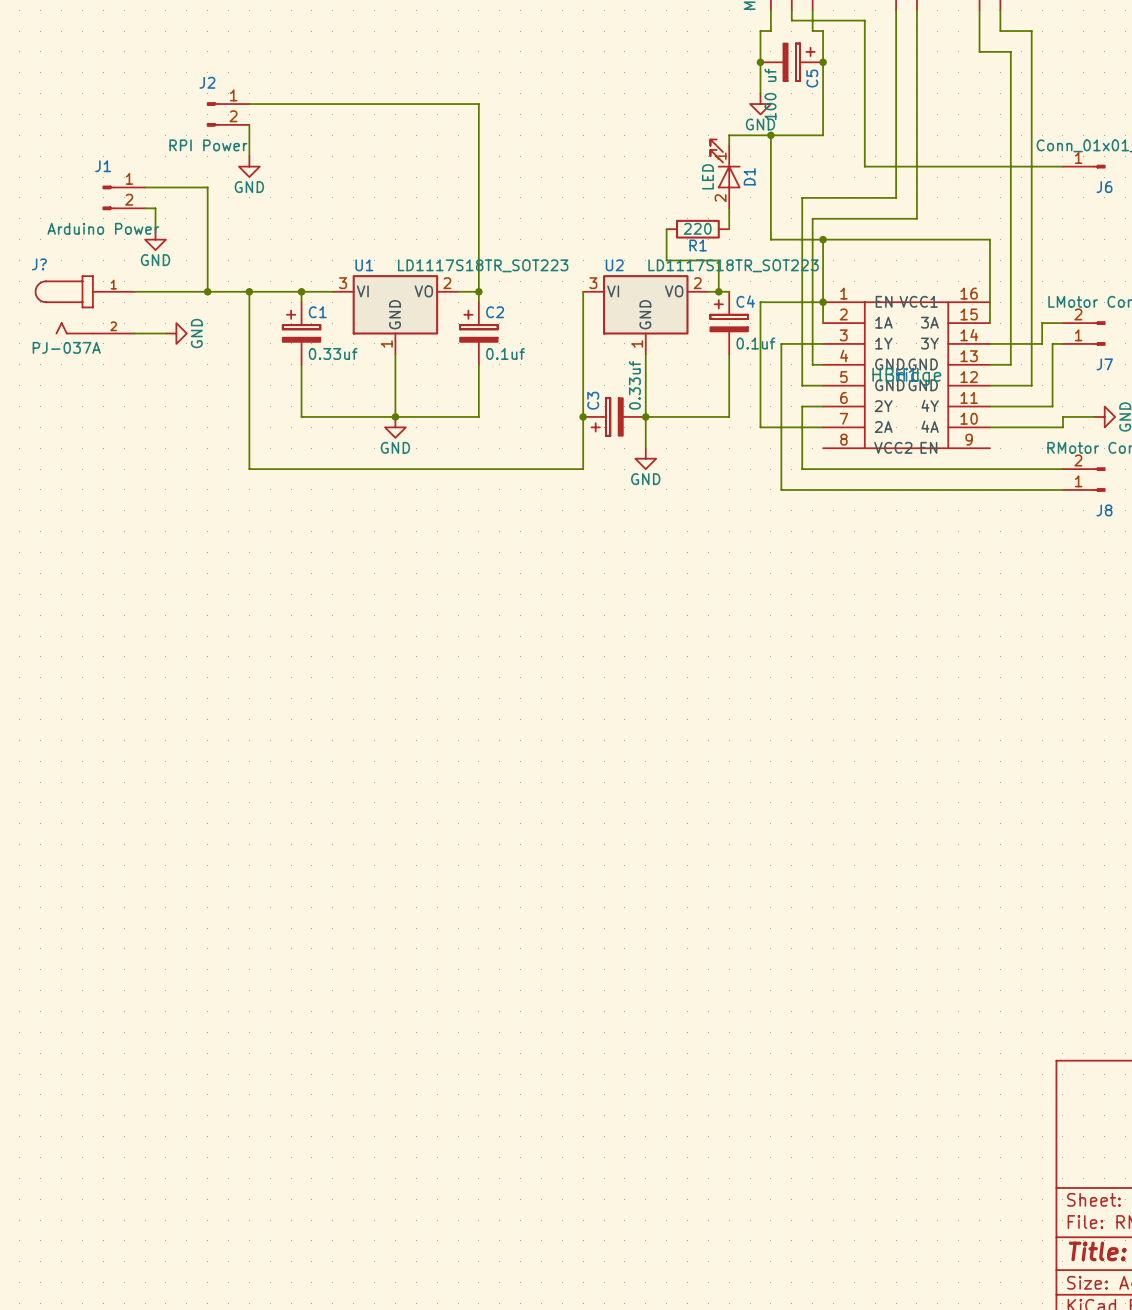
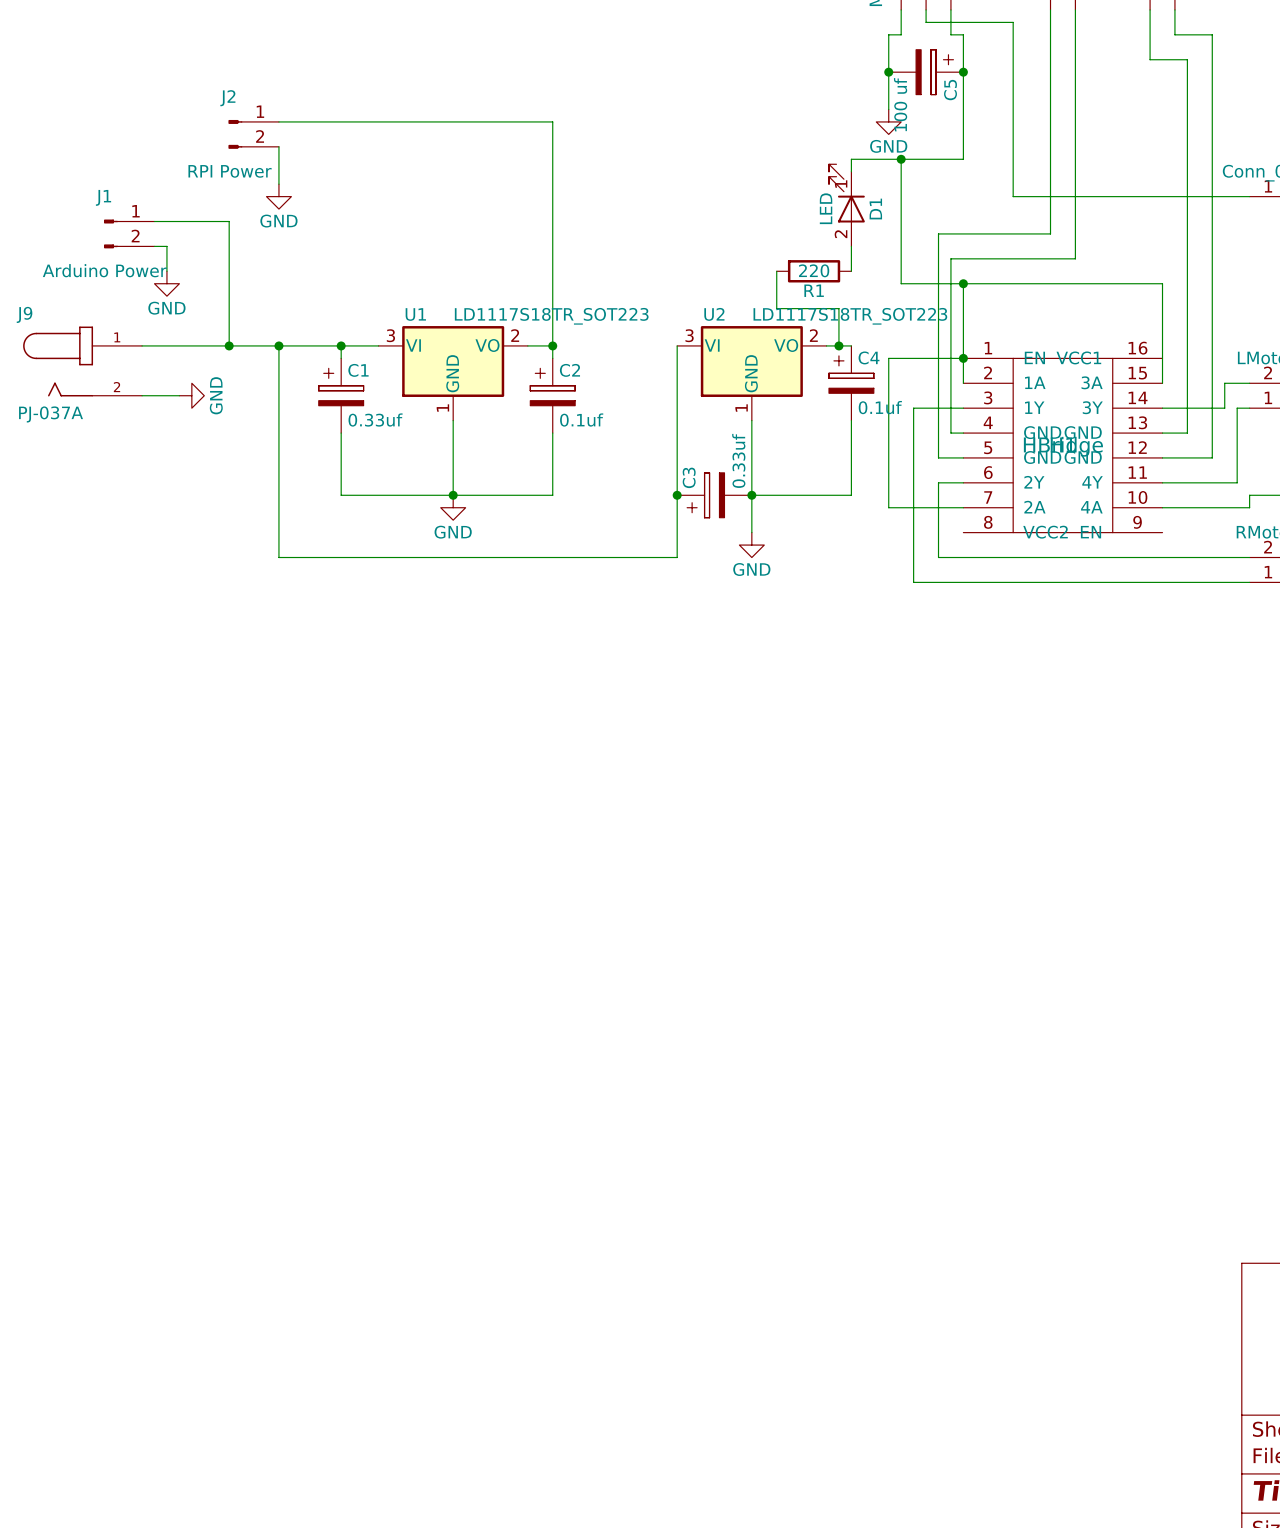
J? name: J? (39, 264) -> J9 (24, 314)

